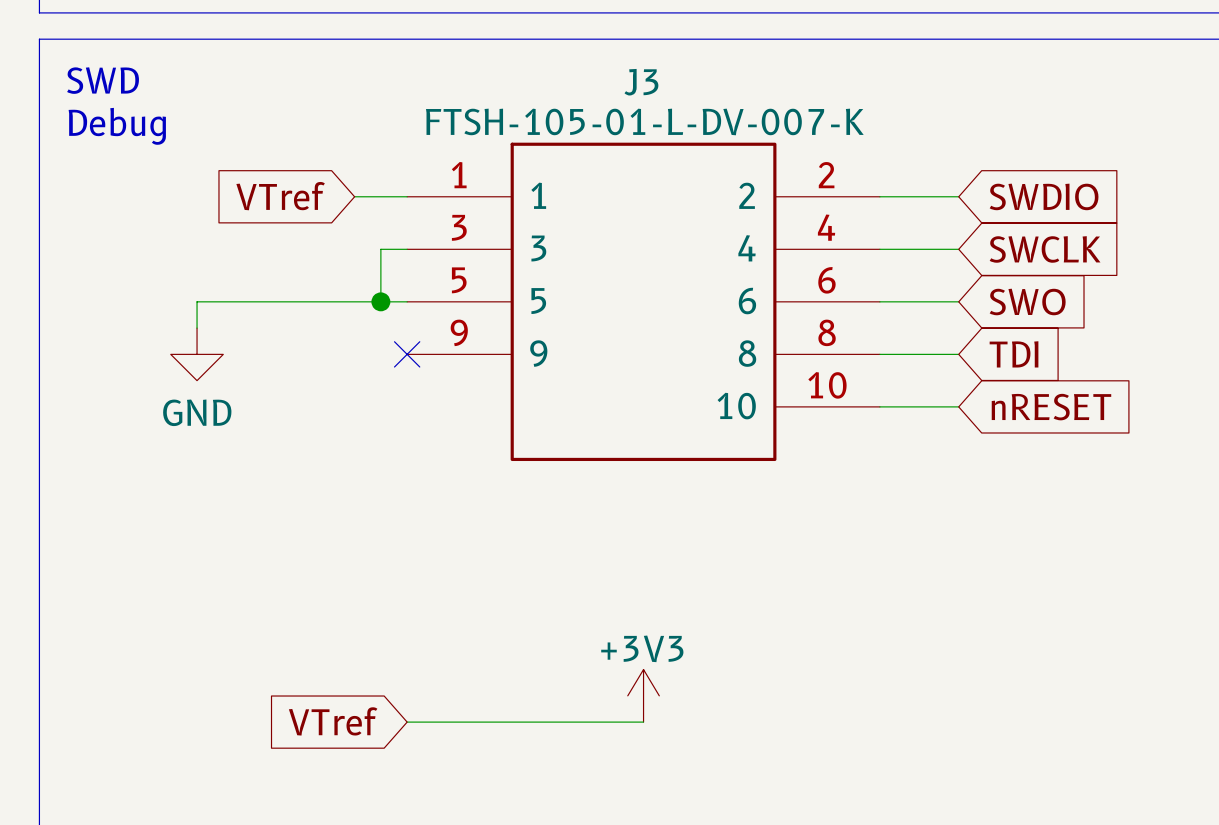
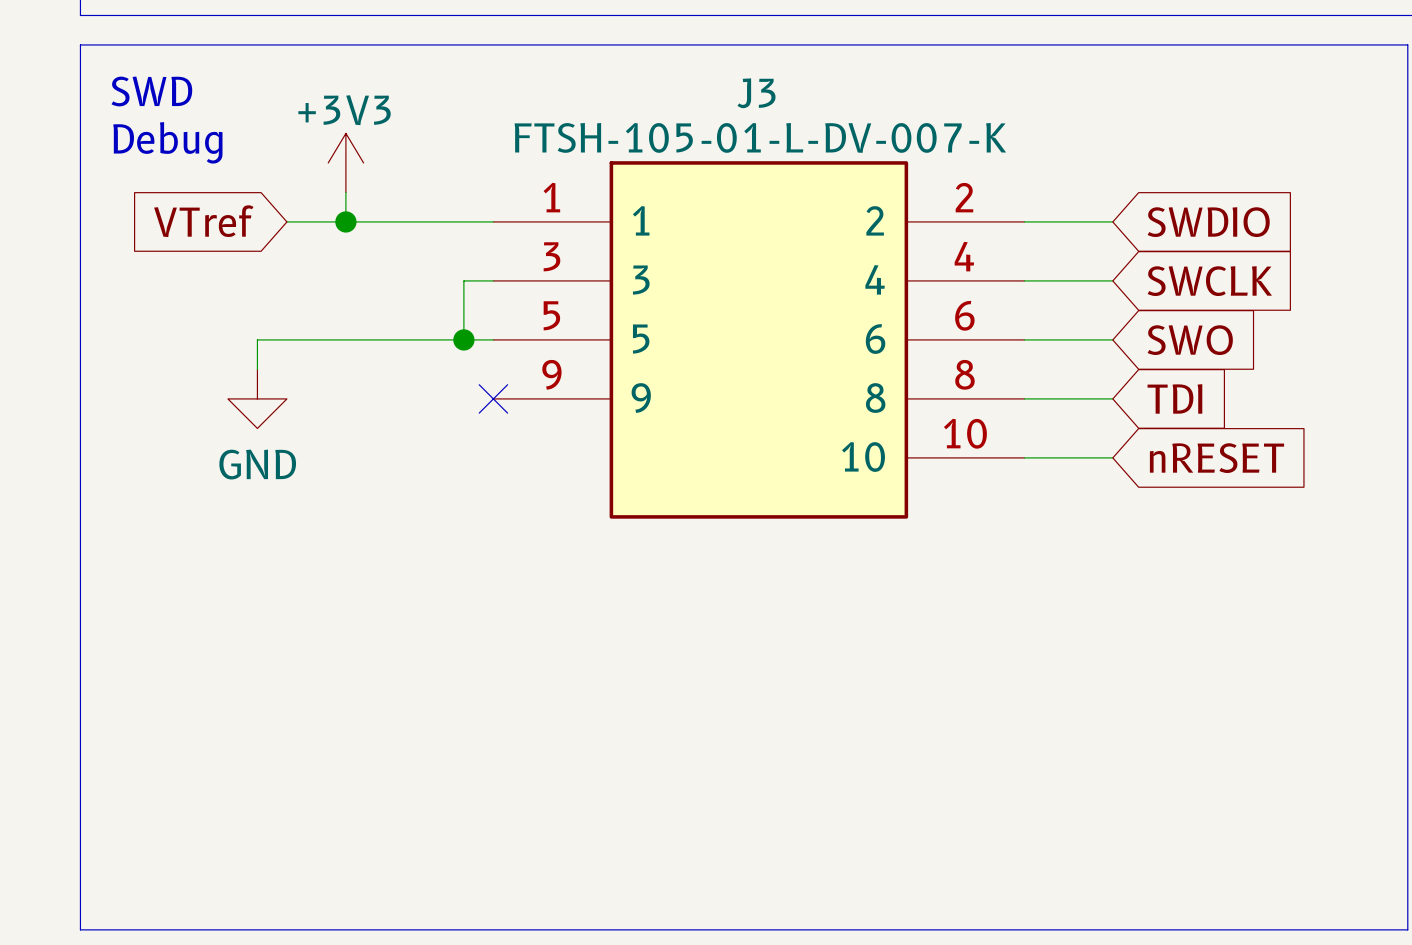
J3 symbol: [407, 142, 880, 462] -> [493, 161, 1025, 519]
power symbol: none -> +3V3 (345, 162)
wire: none -> (345, 192) (345, 221)
wire: none -> (286, 221) (434, 221)
junction: none -> (345, 221)
global label position: VTref (280, 196) -> VTref (203, 221)
power symbol: +3V3 (643, 695) -> none
global label: VTref (333, 721) -> none
wire: (407, 722) (643, 722) -> none

